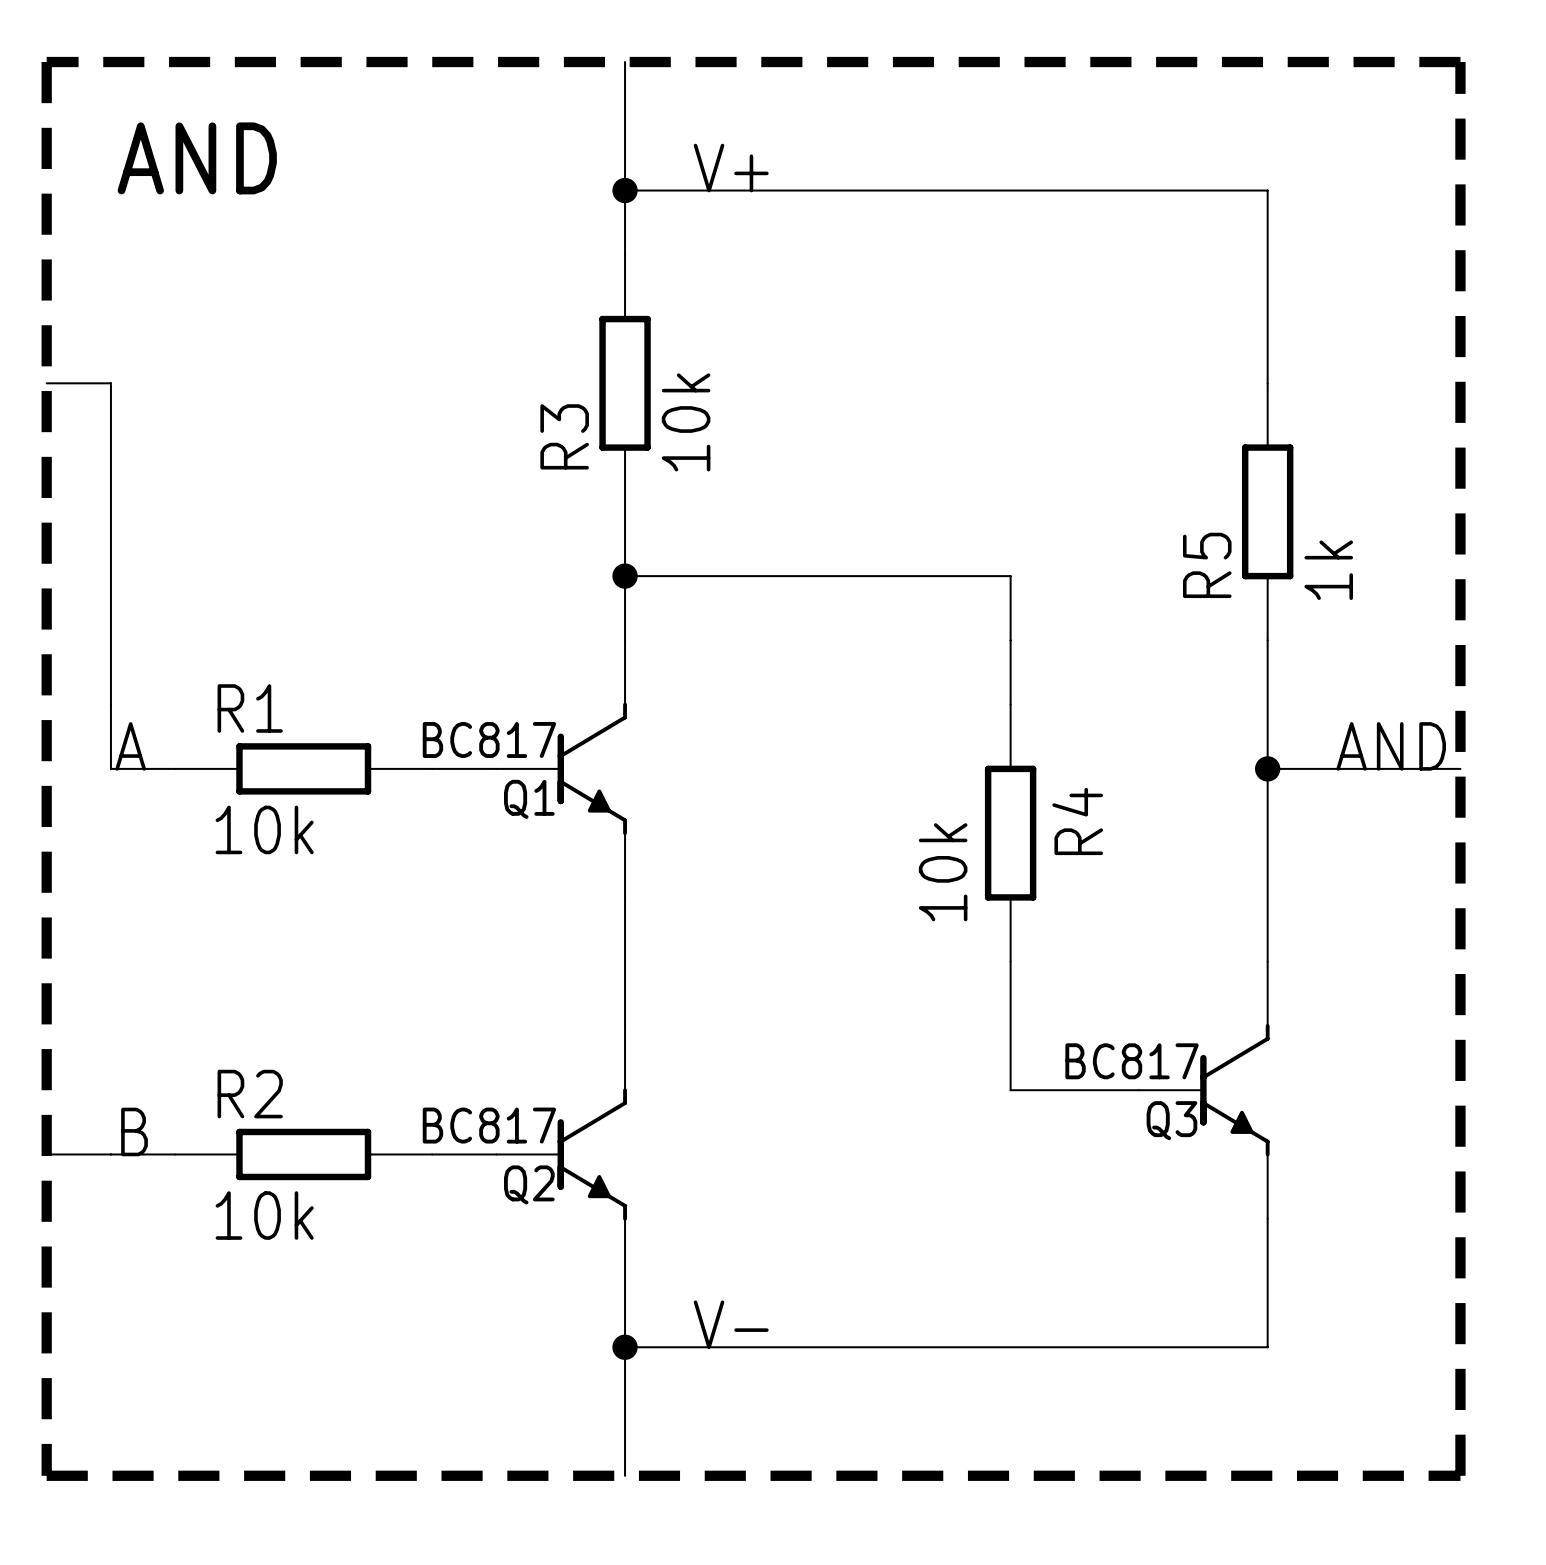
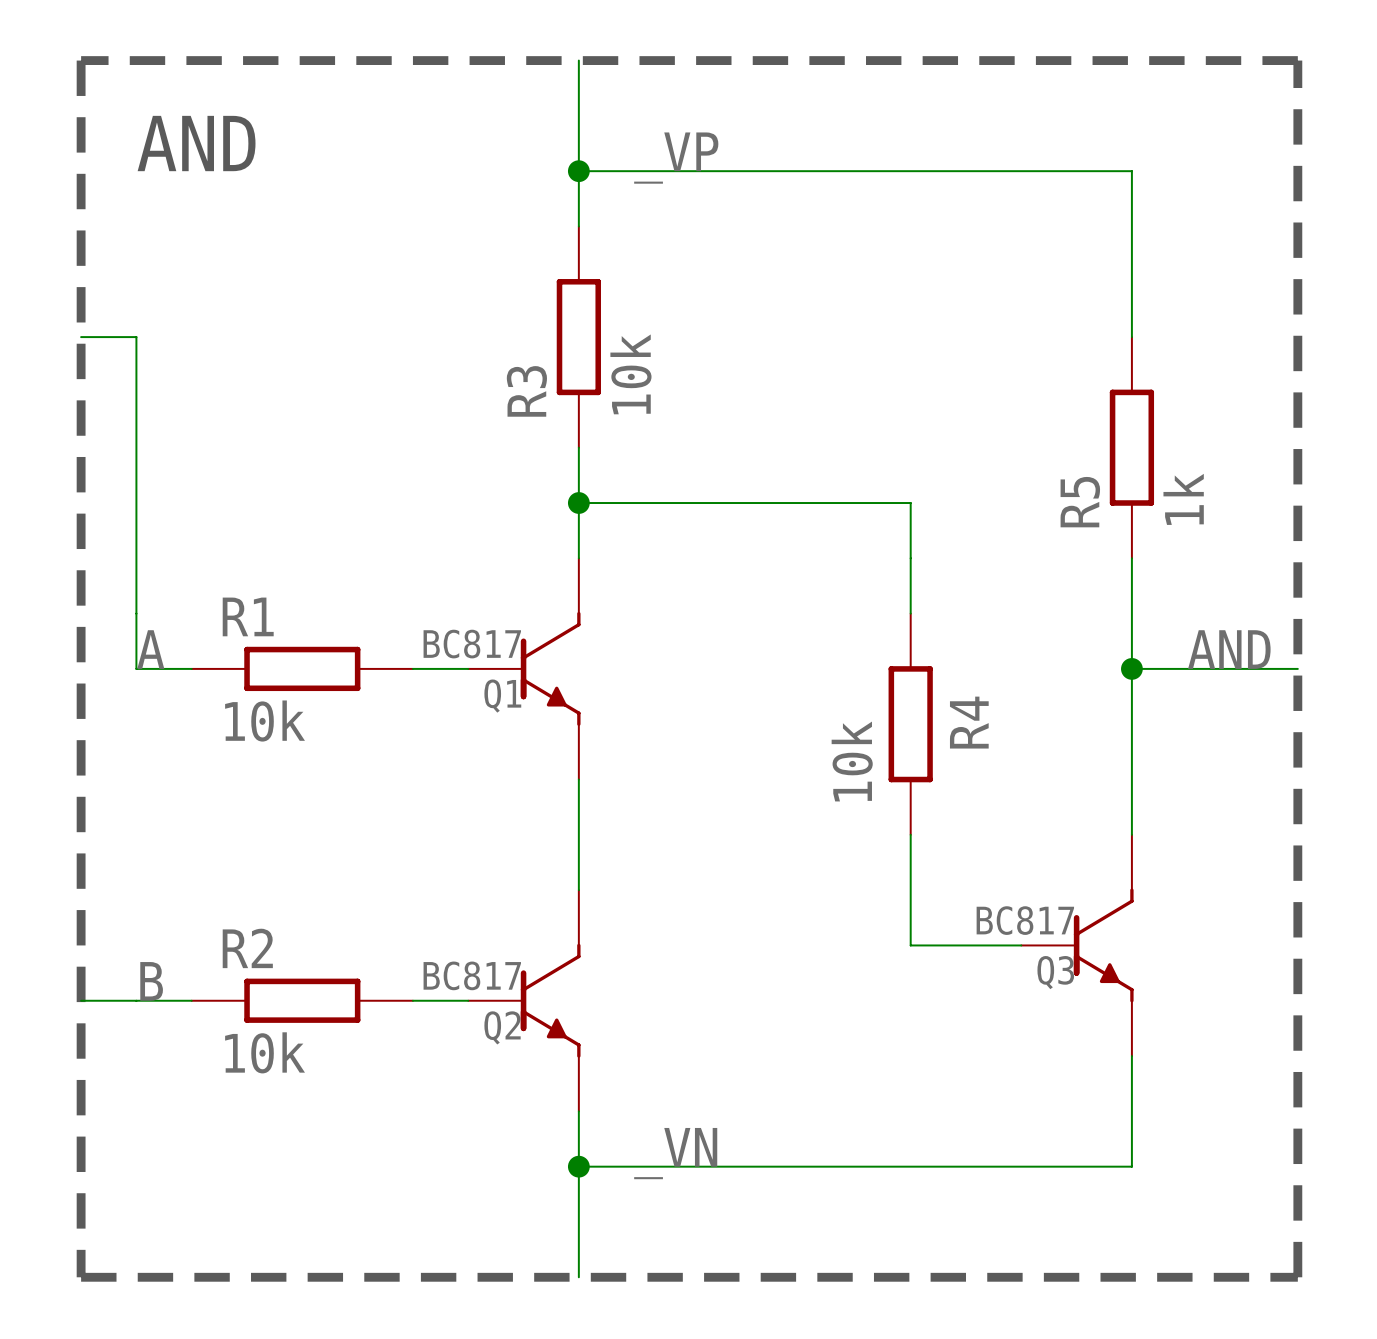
label: V+ (731, 168) -> _VP (676, 158)
label: V- (731, 1324) -> _VN (675, 1153)

